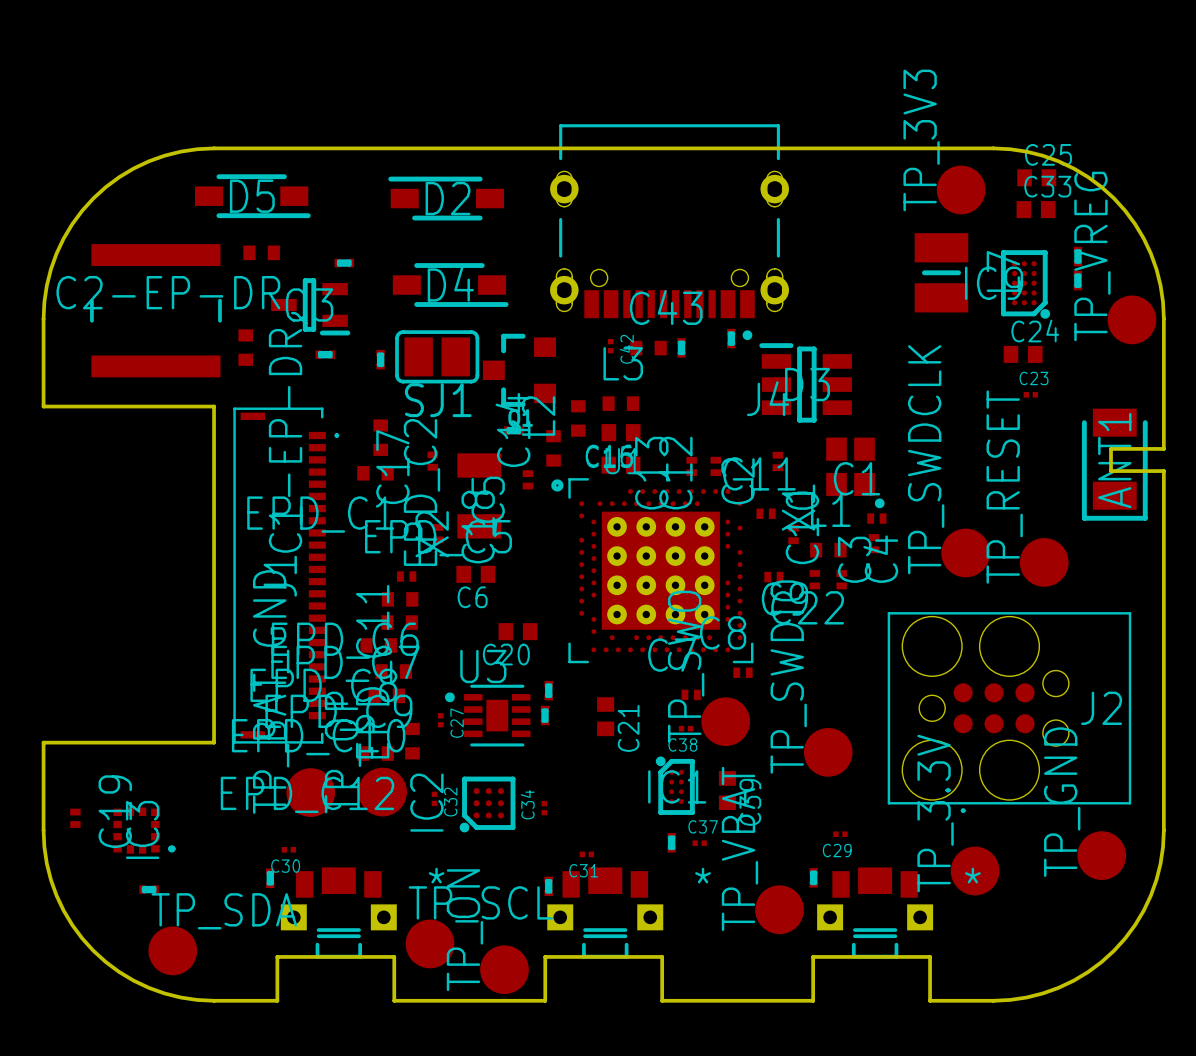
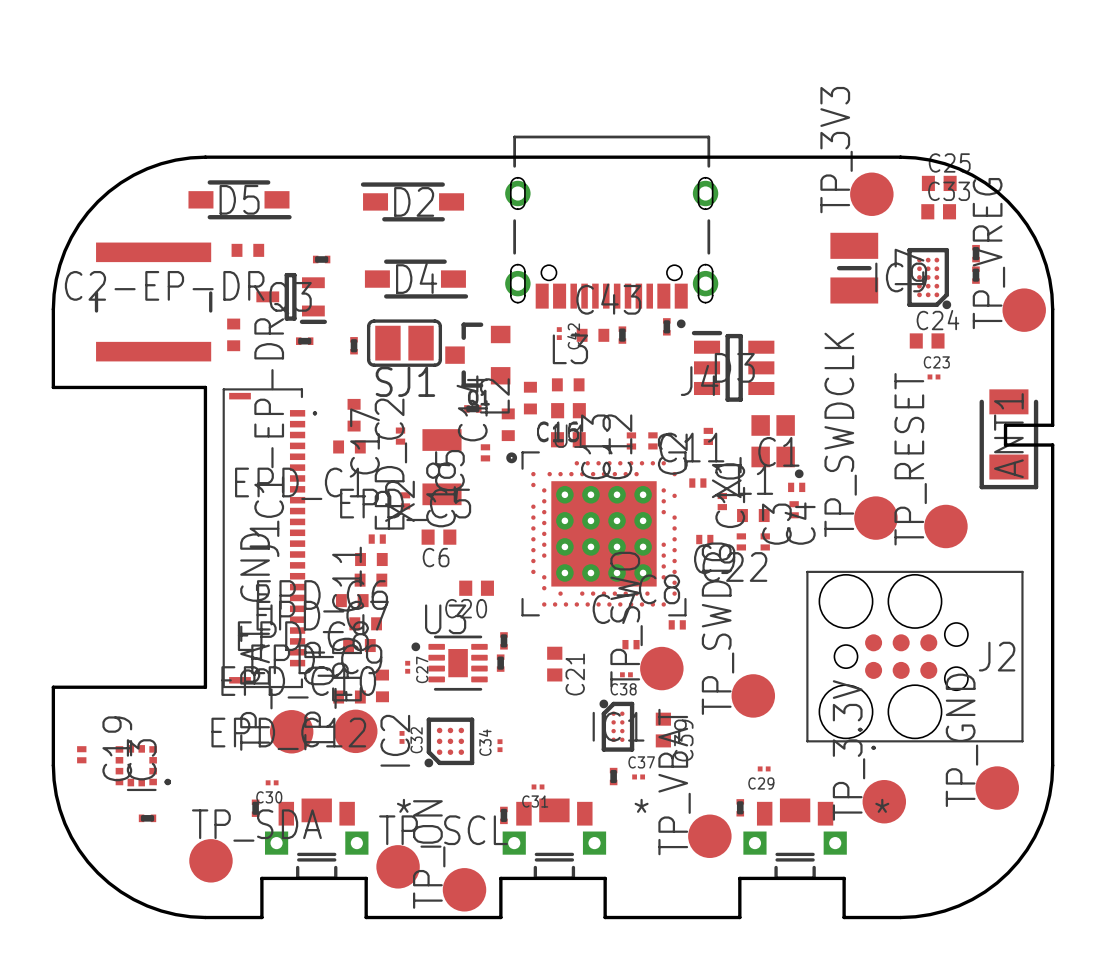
TP_SDA position: (172, 950) -> (210, 860)

